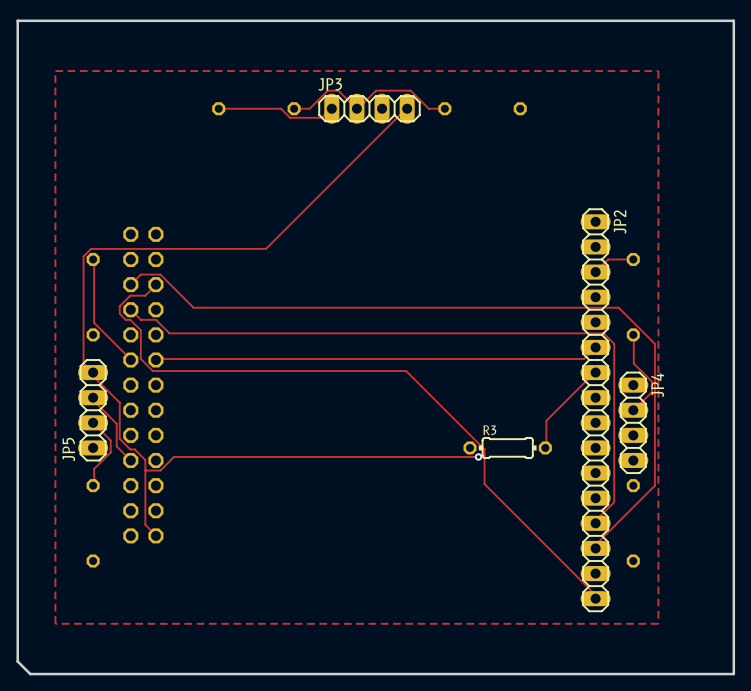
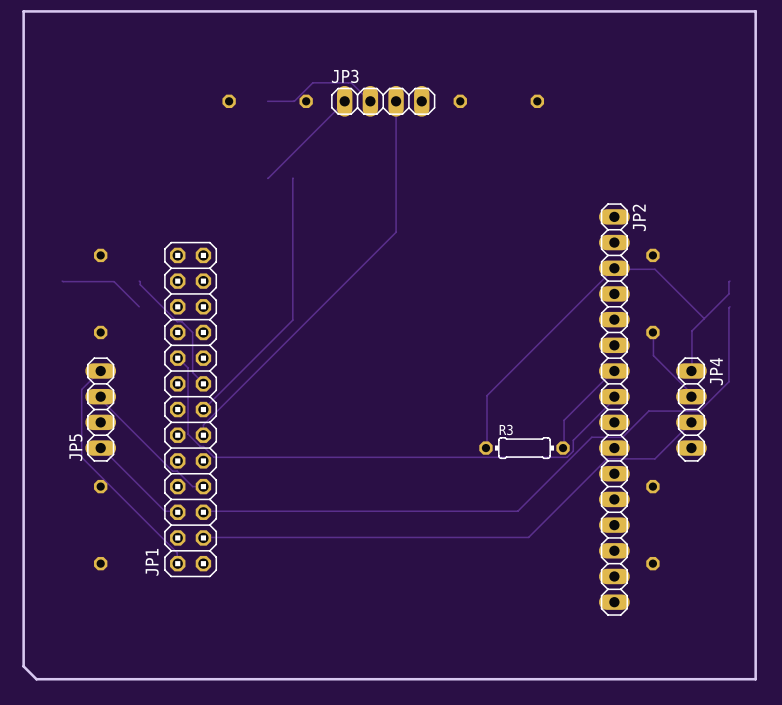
zone outline: (55, 71) (55, 623) (658, 623) (658, 71) (55, 71) -> none
track: (327, 90) (309, 108) (294, 108) -> (340, 82) (312, 82) (292, 101)
track: (218, 108) (256, 108) -> none
track: (281, 108) (290, 117) (321, 117) (331, 108) -> (267, 178) (344, 101)
track: (356, 108) (376, 90) (410, 90) (428, 108) (444, 108) -> none
track: none -> (396, 101) (396, 232) (203, 424) (203, 435)
track: (407, 108) (265, 248) (91, 248) (83, 256) (83, 363) (92, 372) -> (177, 563) (177, 552) (81, 457) (81, 389) (100, 371)
track: none -> (293, 178) (292, 320) (203, 409)
track: (93, 259) (94, 322) (130, 360) -> none
track: (633, 259) (608, 259) (595, 272) -> none
track: (130, 284) (140, 274) (160, 274) (193, 307) (618, 307) (654, 343) (654, 485) (596, 544) (595, 548) -> (139, 281) (140, 284) (177, 321) (181, 321) (192, 332) (192, 372) (203, 383)
track: (155, 284) (145, 295) (130, 295) (119, 306) (119, 313) (125, 319) (130, 319) (140, 330) (140, 358) (152, 371) (406, 371) (484, 449) (484, 484) (594, 594) (595, 598) -> none
track: none -> (729, 281) (728, 293) (691, 330) (691, 371)
track: (130, 309) (140, 319) (155, 319) (169, 333) (603, 333) (614, 343) (614, 502) (596, 520) (595, 523) -> (139, 306) (114, 281) (62, 281)
track: none -> (729, 306) (728, 381) (699, 411) (648, 411) (622, 437) (591, 437) (517, 511) (203, 512)
track: none -> (704, 318) (654, 269) (614, 268) (486, 395) (485, 448)
track: (595, 347) (584, 358) (155, 360) -> none
track: (633, 357) (633, 363) (651, 381) (651, 392) (633, 410) -> (653, 355) (690, 392) (691, 396)
track: (93, 372) (94, 377) (119, 402) (119, 438) (145, 460) (145, 524) (155, 535) -> none
JP1 side: bottom (143, 385) -> top (190, 409)
track: none -> (614, 396) (613, 400) (573, 440) (573, 451) (567, 457) (494, 457)
track: (93, 422) (110, 440) (110, 452) (94, 469) (93, 485) -> none
JP4 position: (633, 422) -> (691, 409)
track: none -> (691, 422) (654, 458) (607, 458) (528, 537) (203, 537)
track: (116, 423) (116, 446) (130, 460) -> (124, 423) (172, 471) (177, 471) (192, 486) (203, 486)
track: none -> (100, 448) (164, 511) (177, 512)
track: (204, 456) (174, 456) (160, 470) (145, 470) -> (214, 457) (188, 434) (188, 367) (177, 358)
via: (478, 456) -> none

